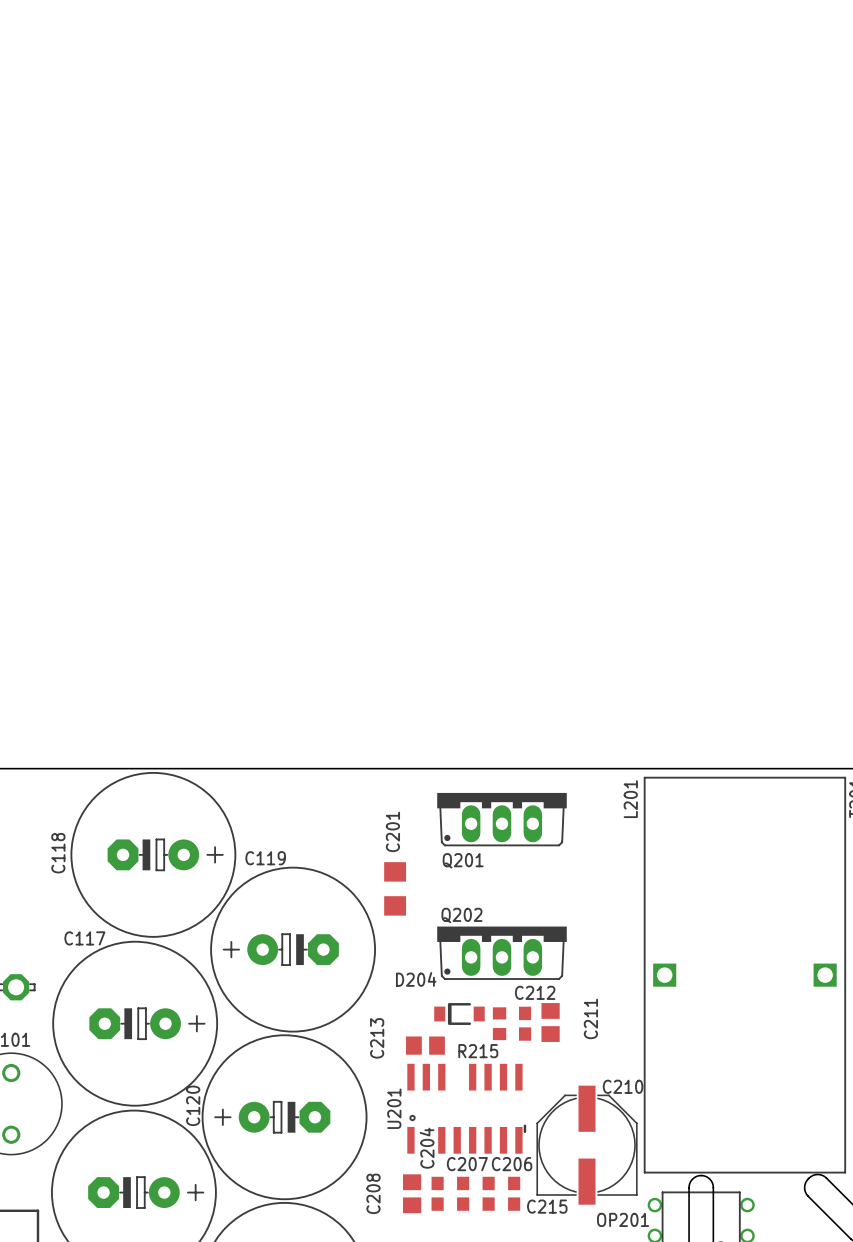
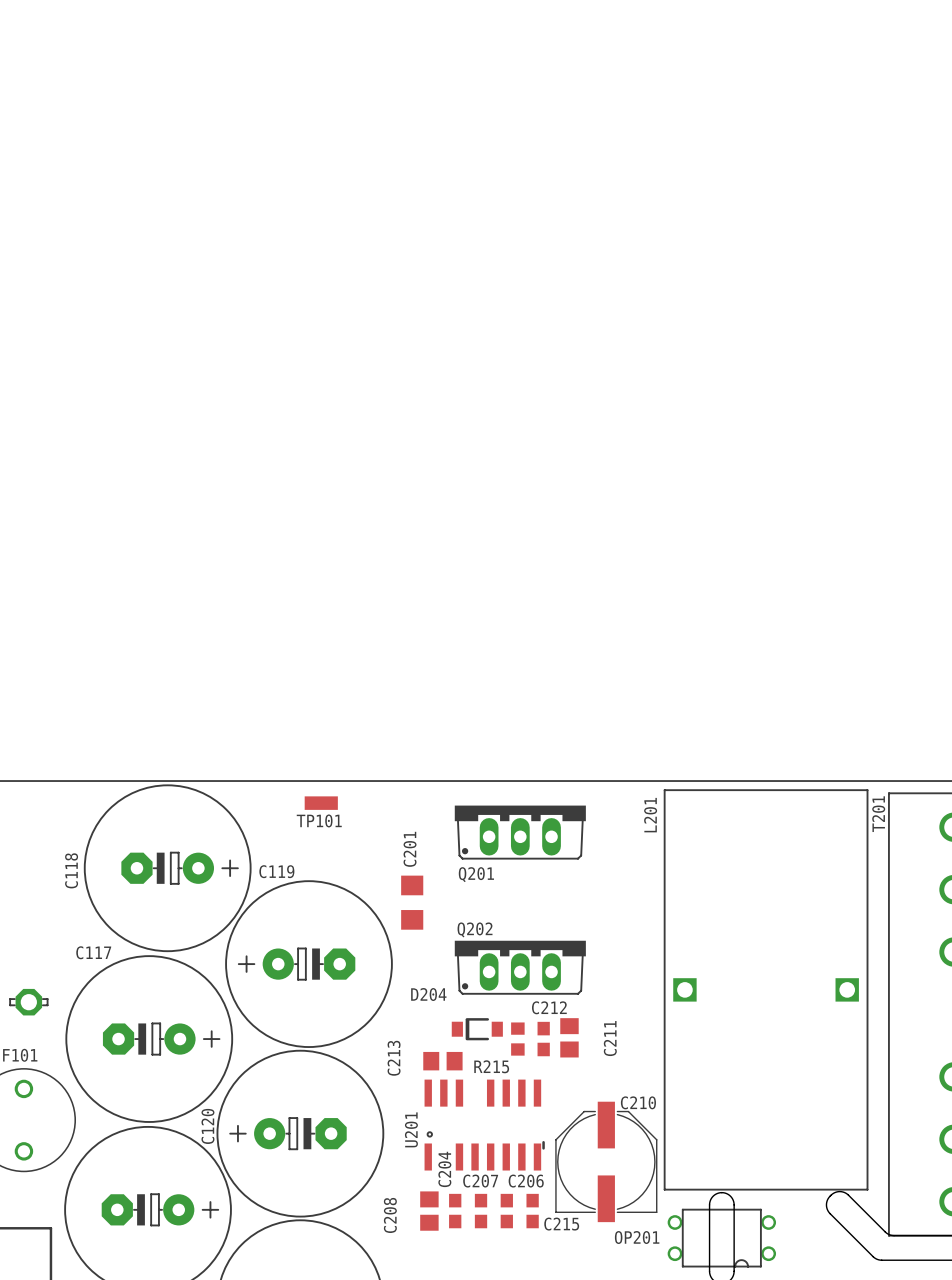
TP101: none -> (321, 803)

